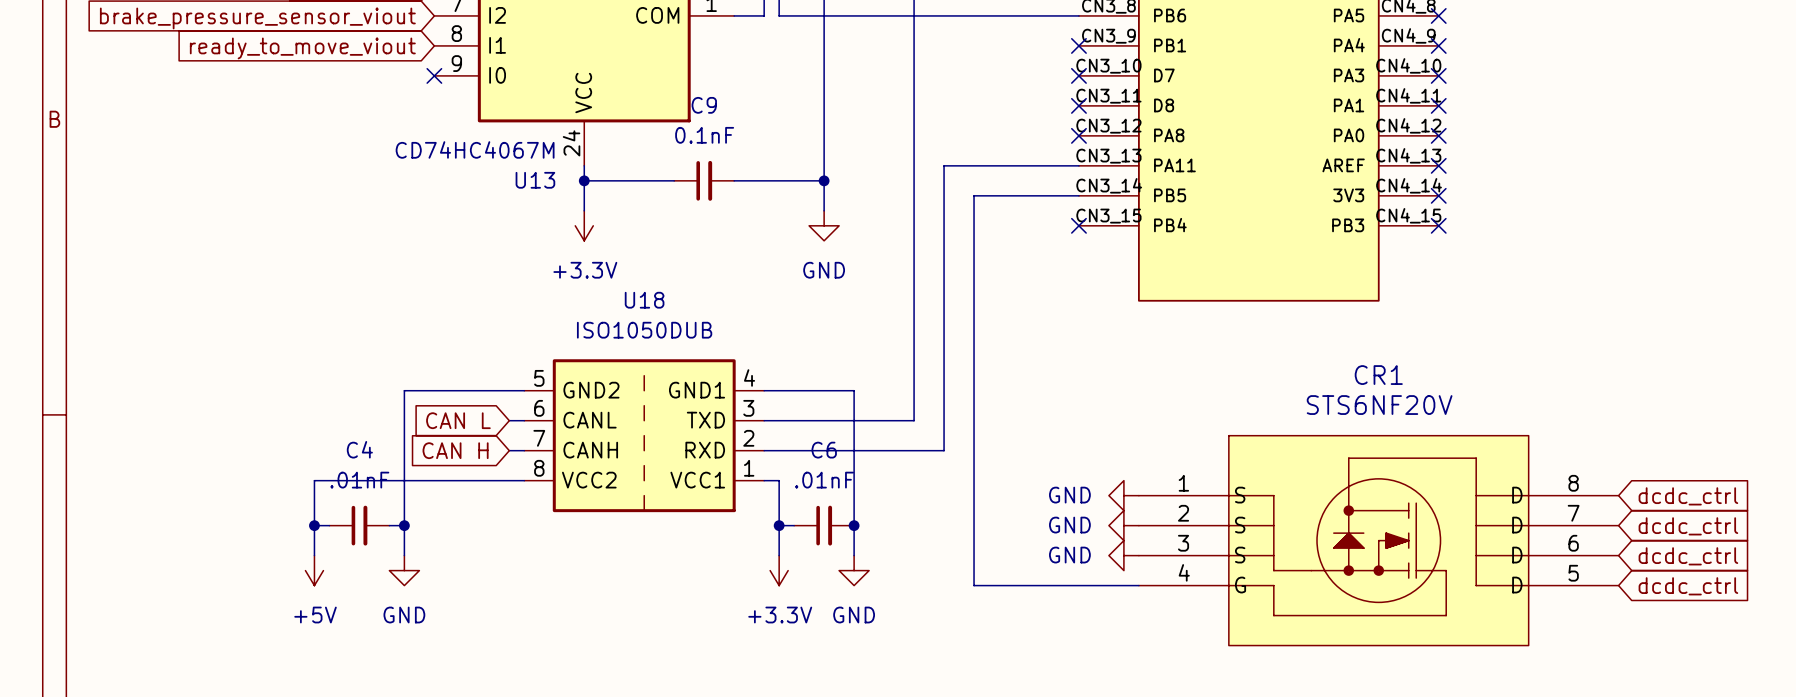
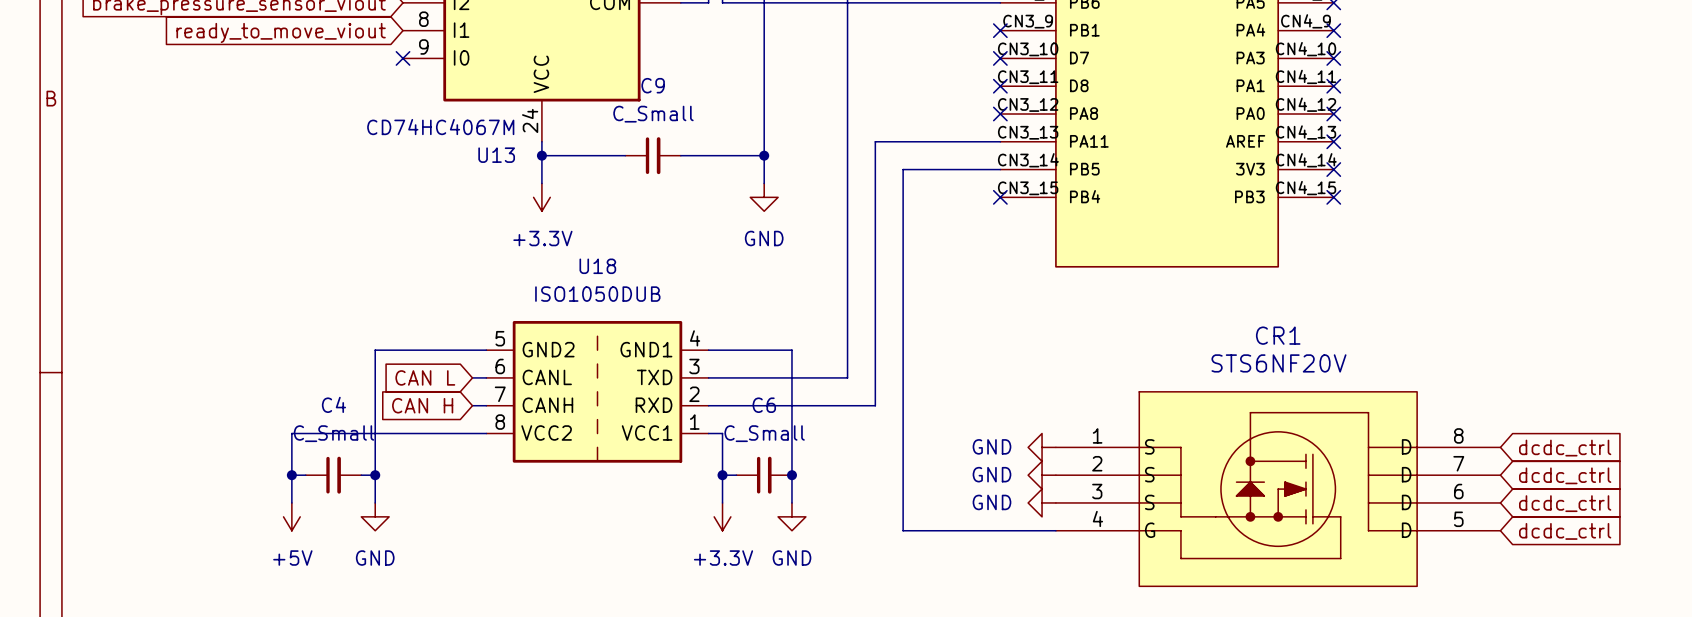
C9 value: 0.1nF (704, 135) -> C_Small (653, 114)
C4 value: .01nF (359, 480) -> C_Small (333, 433)
C6 value: .01nF (824, 480) -> C_Small (764, 433)

